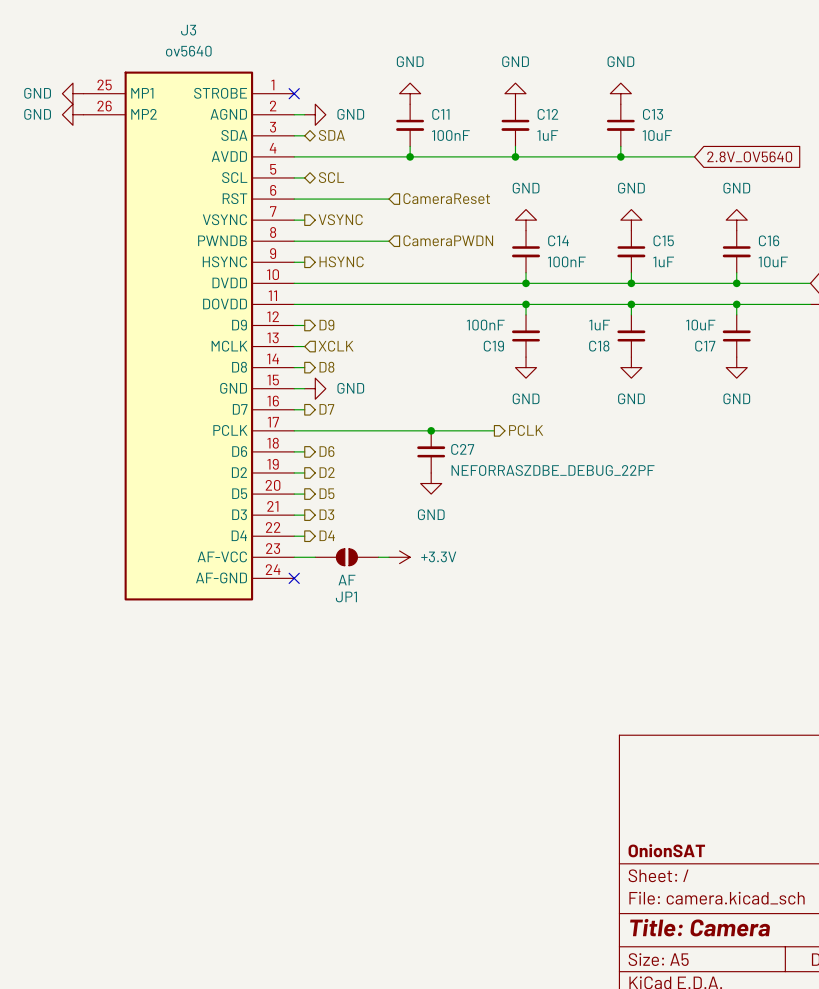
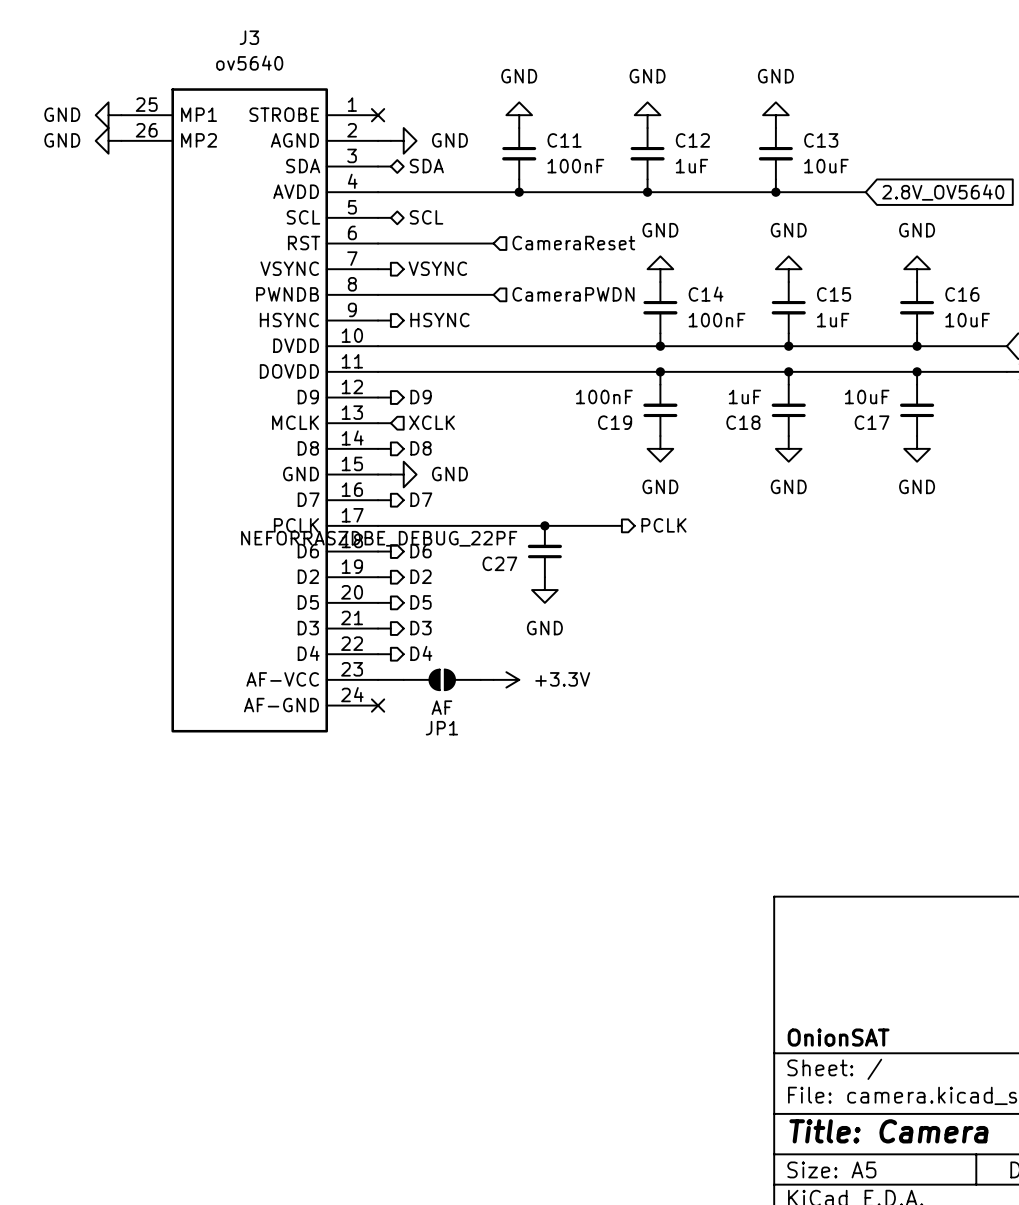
C27 name position: C27 (462, 449) -> C27 (499, 563)
C27 value position: NEFORRASZDBE_DEBUG_22PF (553, 470) -> NEFORRASZDBE_DEBUG_22PF (379, 538)

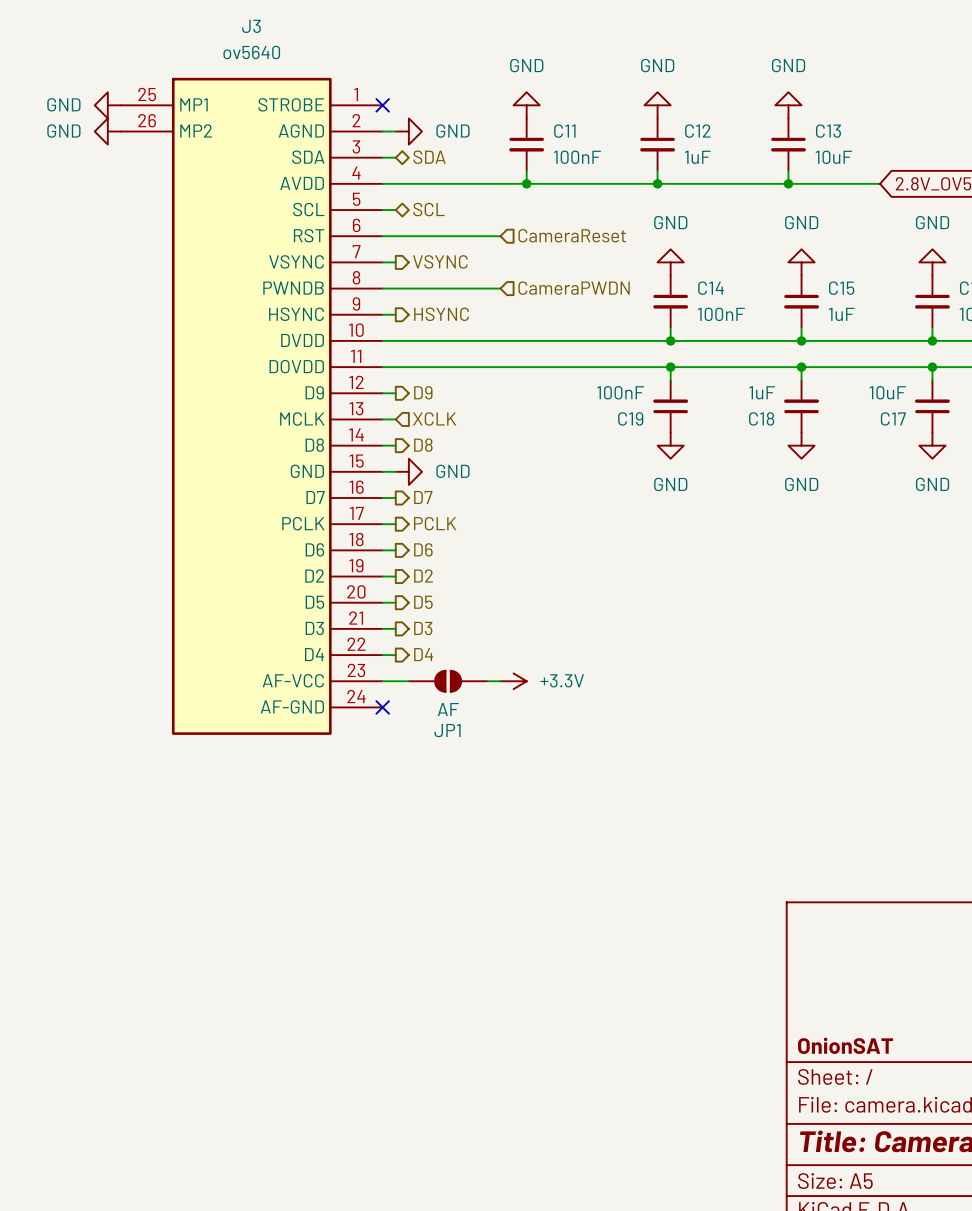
wire: (390, 525) (621, 525) -> none
junction: (544, 525) -> none
hierarchical label position: PCLK (663, 525) -> PCLK (435, 523)
C27: NEFORRASZDBE_DEBUG_22PF (544, 551) -> none
power symbol: GND (544, 590) -> none

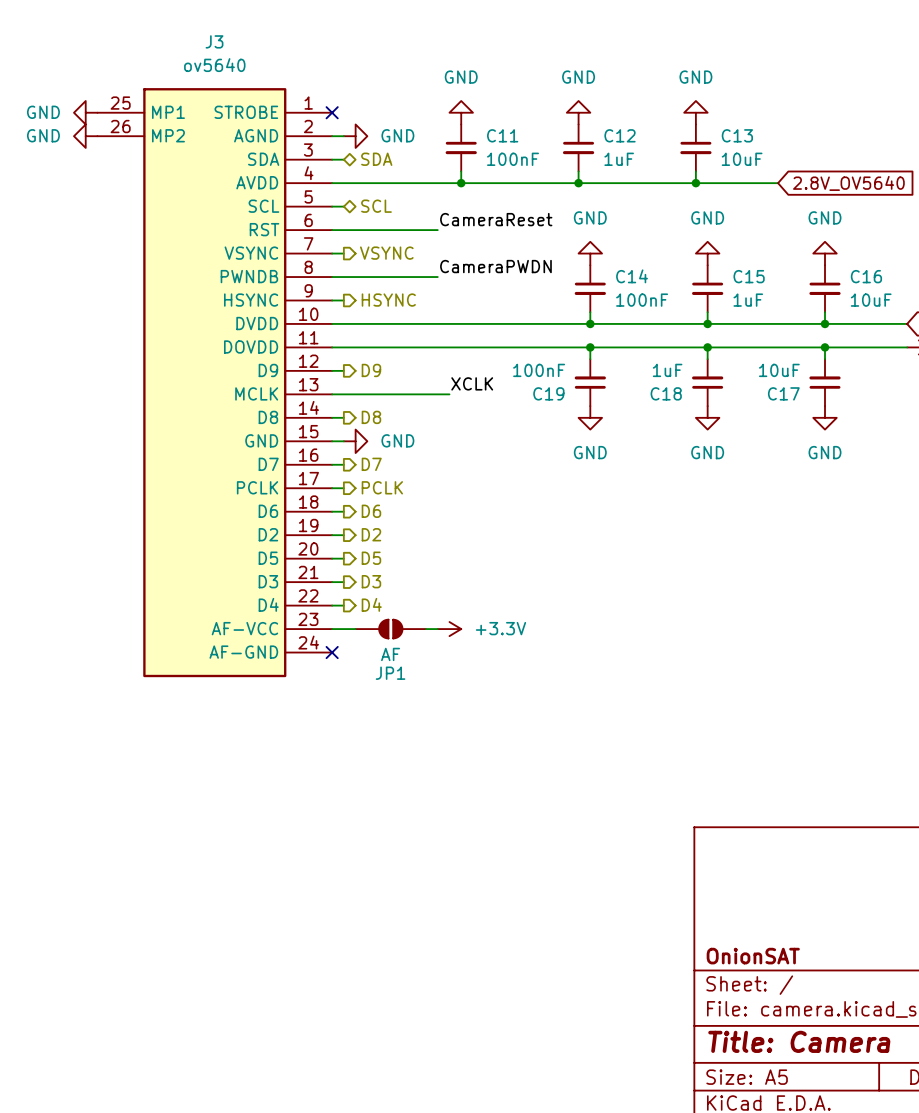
label: none -> CameraReset (496, 219)
hierarchical label: CameraReset (572, 235) -> none
label: none -> CameraPWDN (495, 266)
hierarchical label: CameraPWDN (574, 288) -> none
label: none -> XCLK (472, 383)
hierarchical label: XCLK (434, 418) -> none
wire: none -> (343, 394) (449, 394)

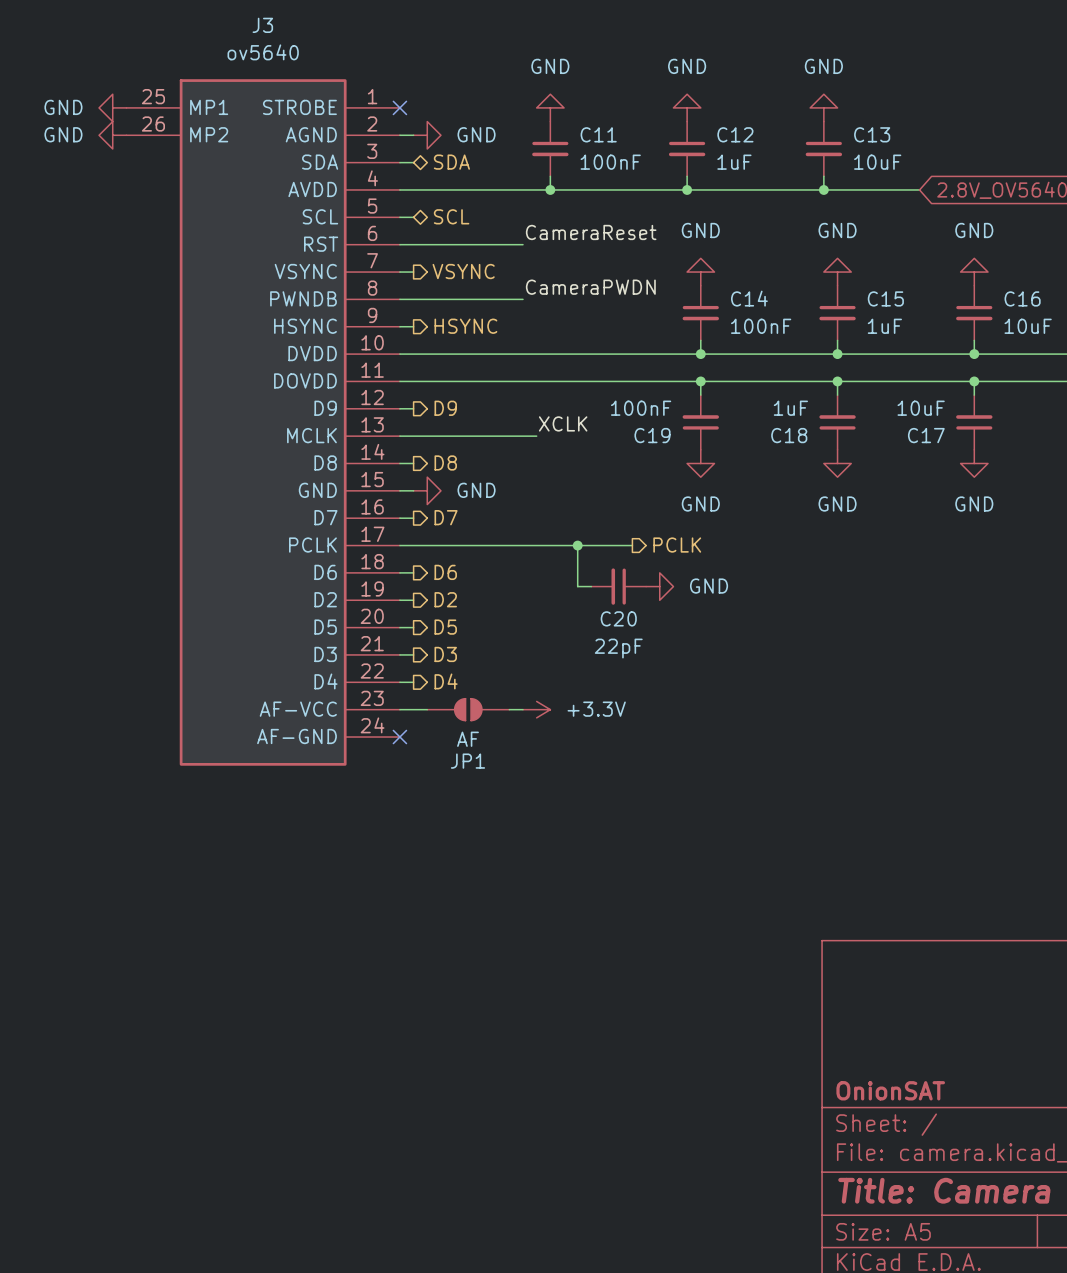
hierarchical label position: PCLK (382, 487) -> PCLK (677, 545)
wire: none -> (413, 545) (632, 545)
wire: none -> (577, 545) (577, 586) (591, 586)
junction: none -> (577, 545)
C20: none -> 22pF (618, 586)
power symbol: none -> GND (659, 586)

